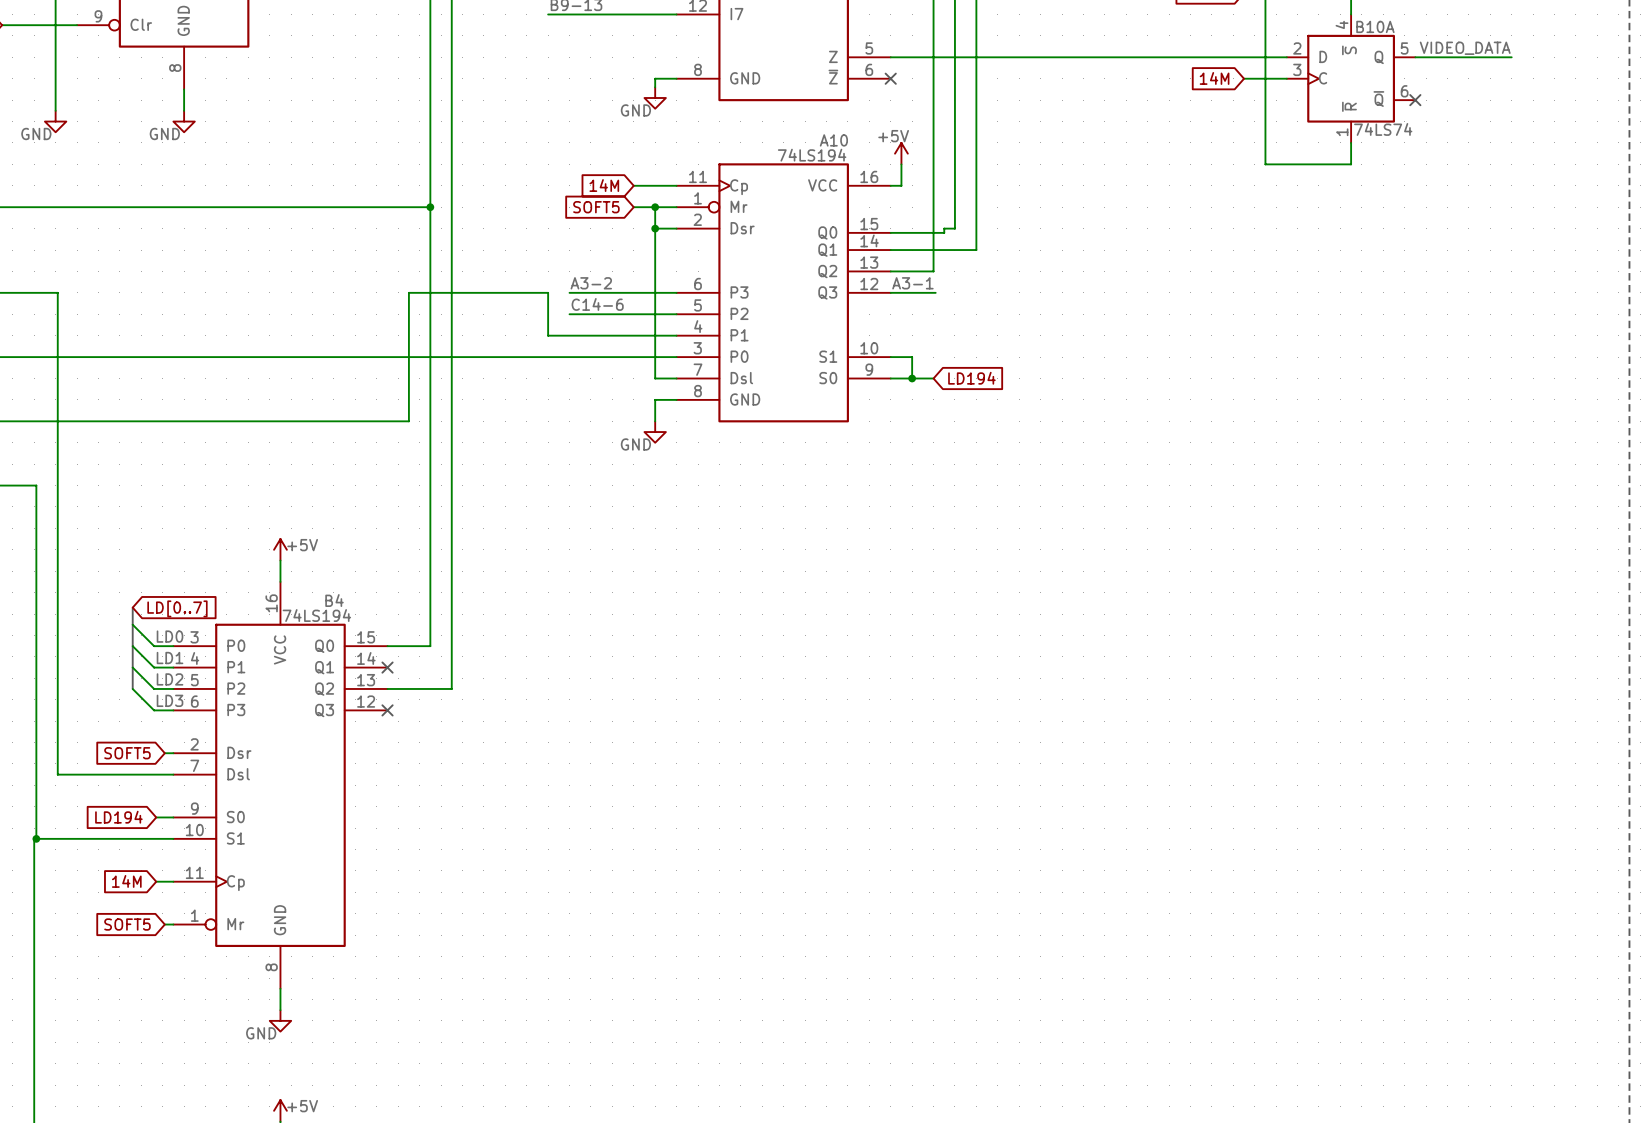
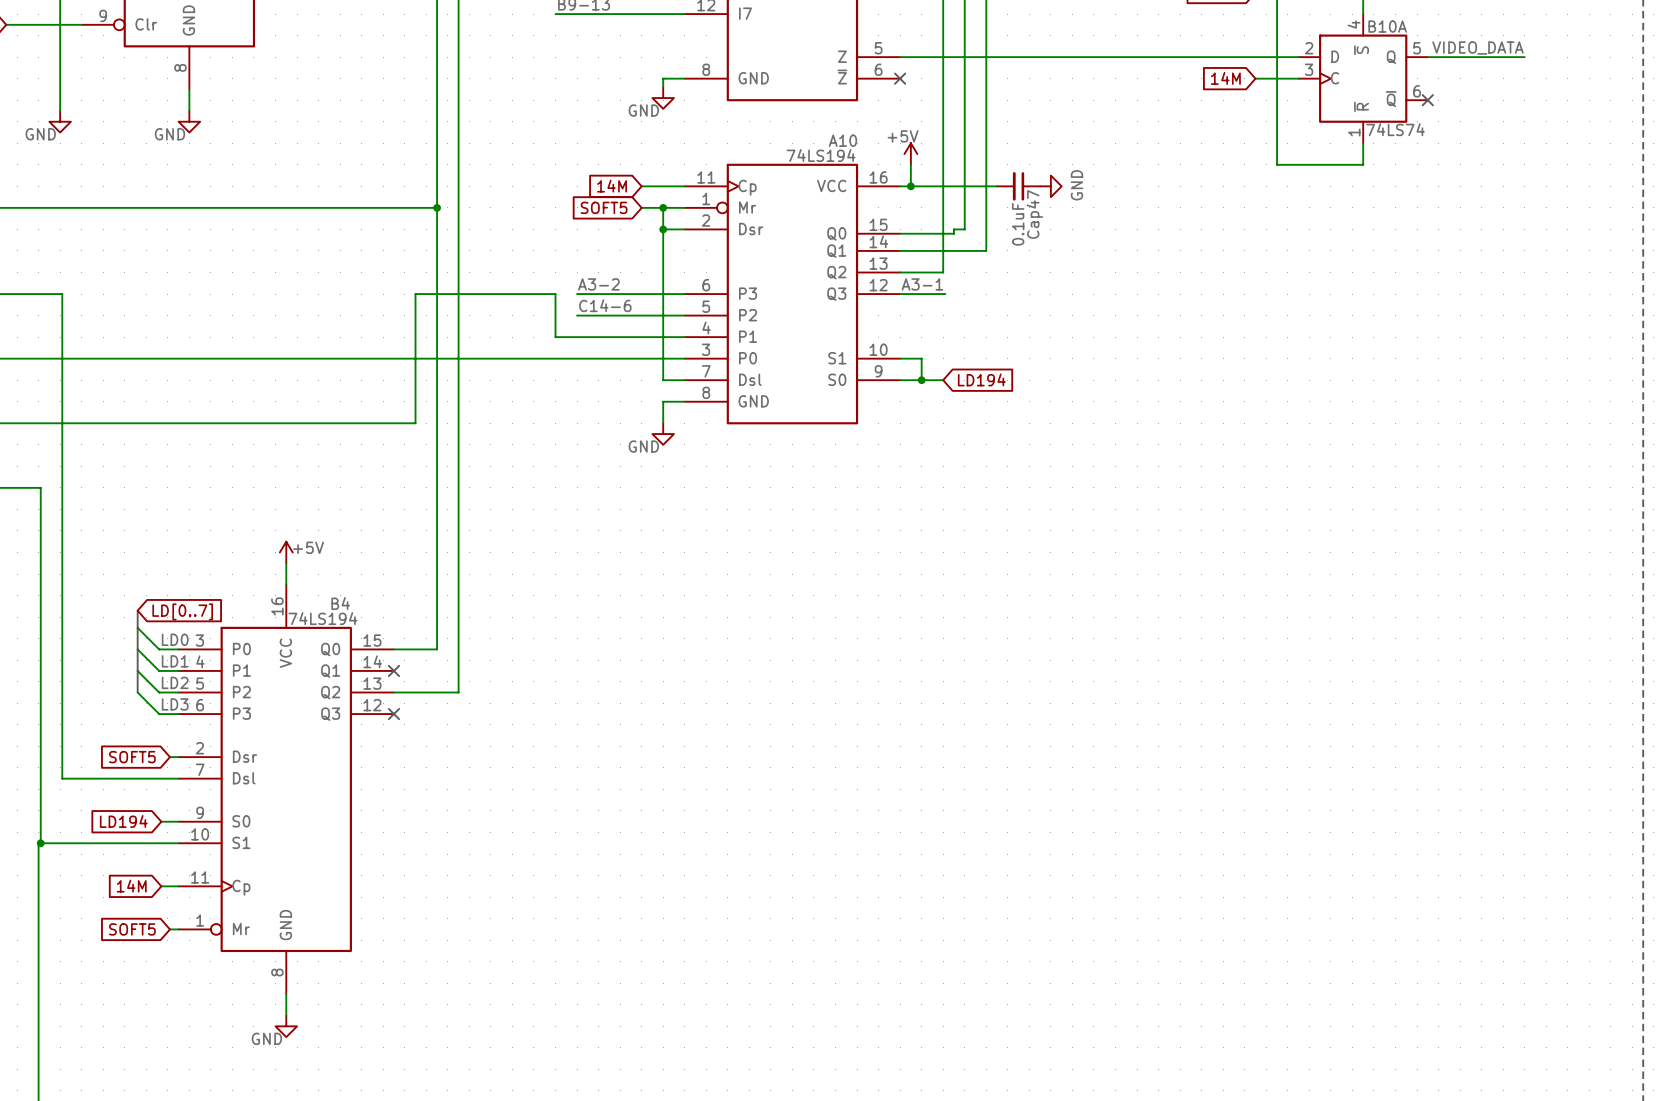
wire: none -> (910, 186) (997, 186)
junction: none -> (910, 186)
Cap47: none -> 0.1uF (1018, 186)
power symbol: none -> GND (1050, 186)

